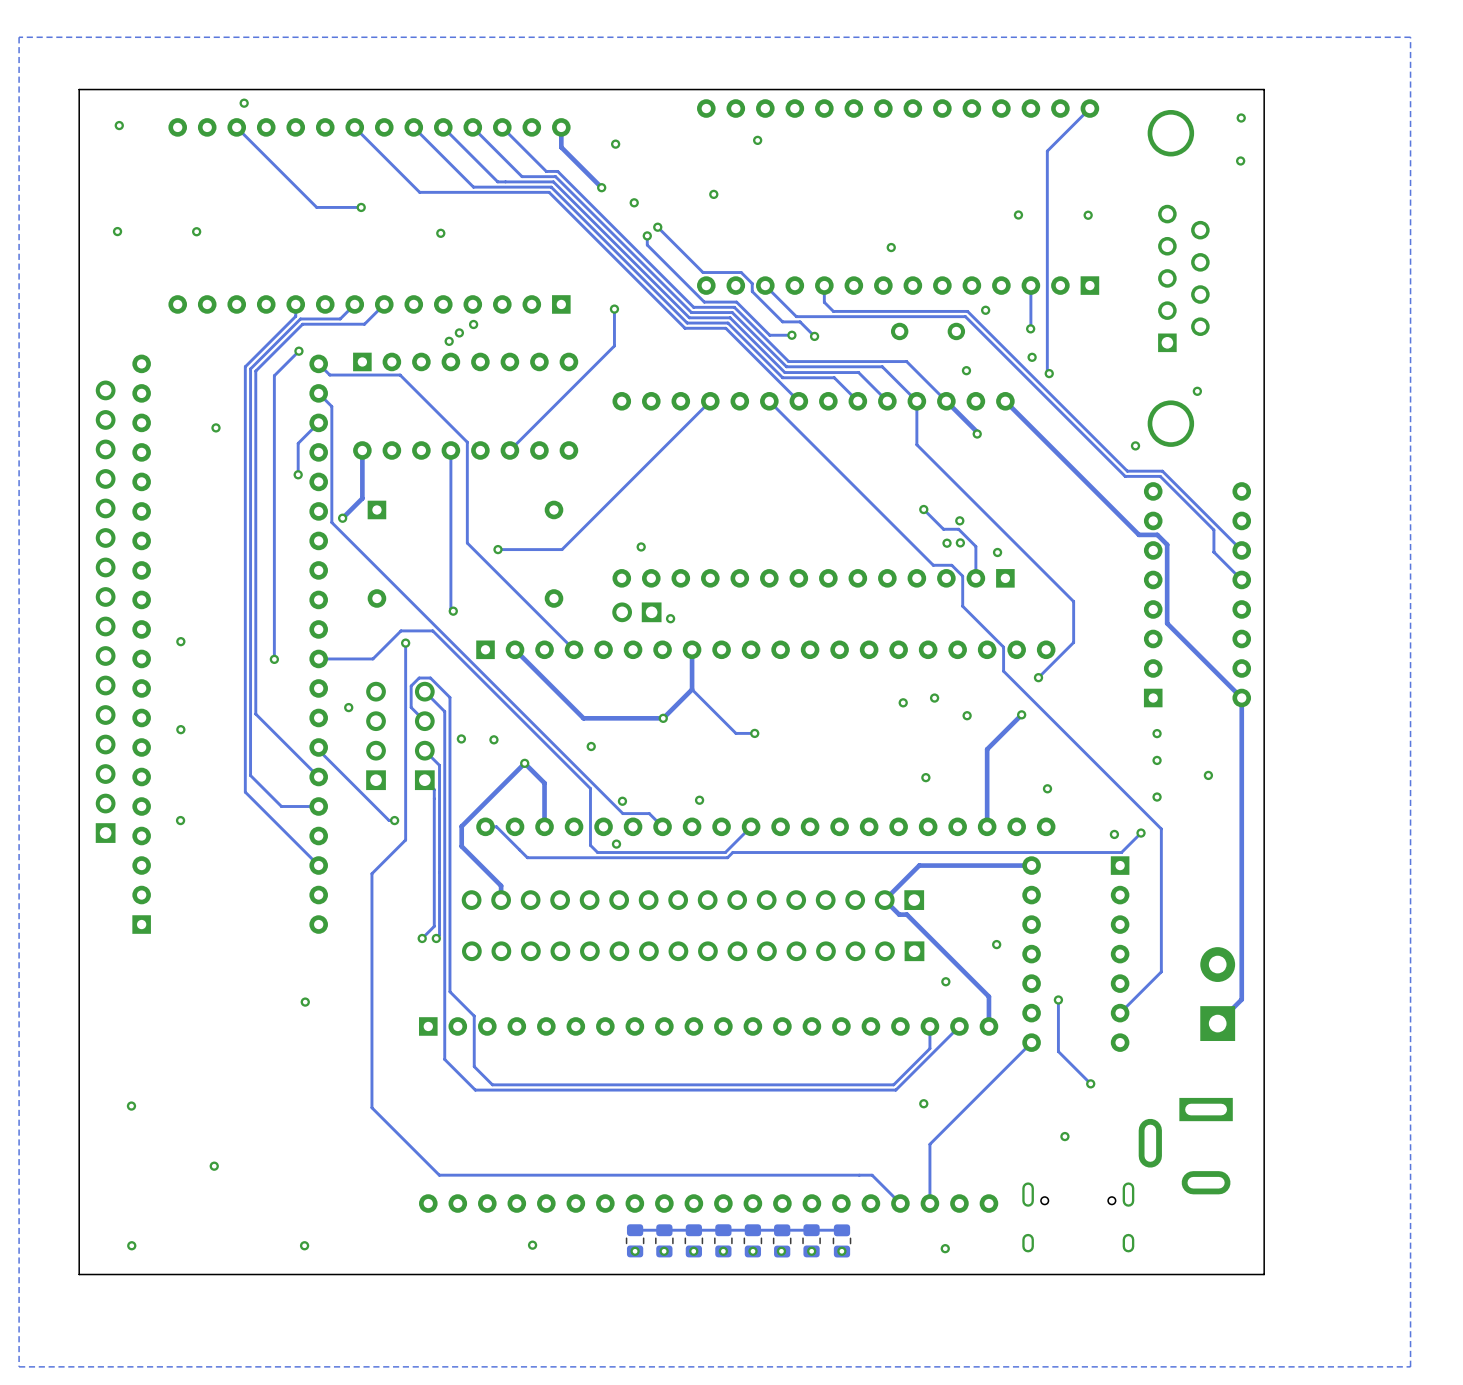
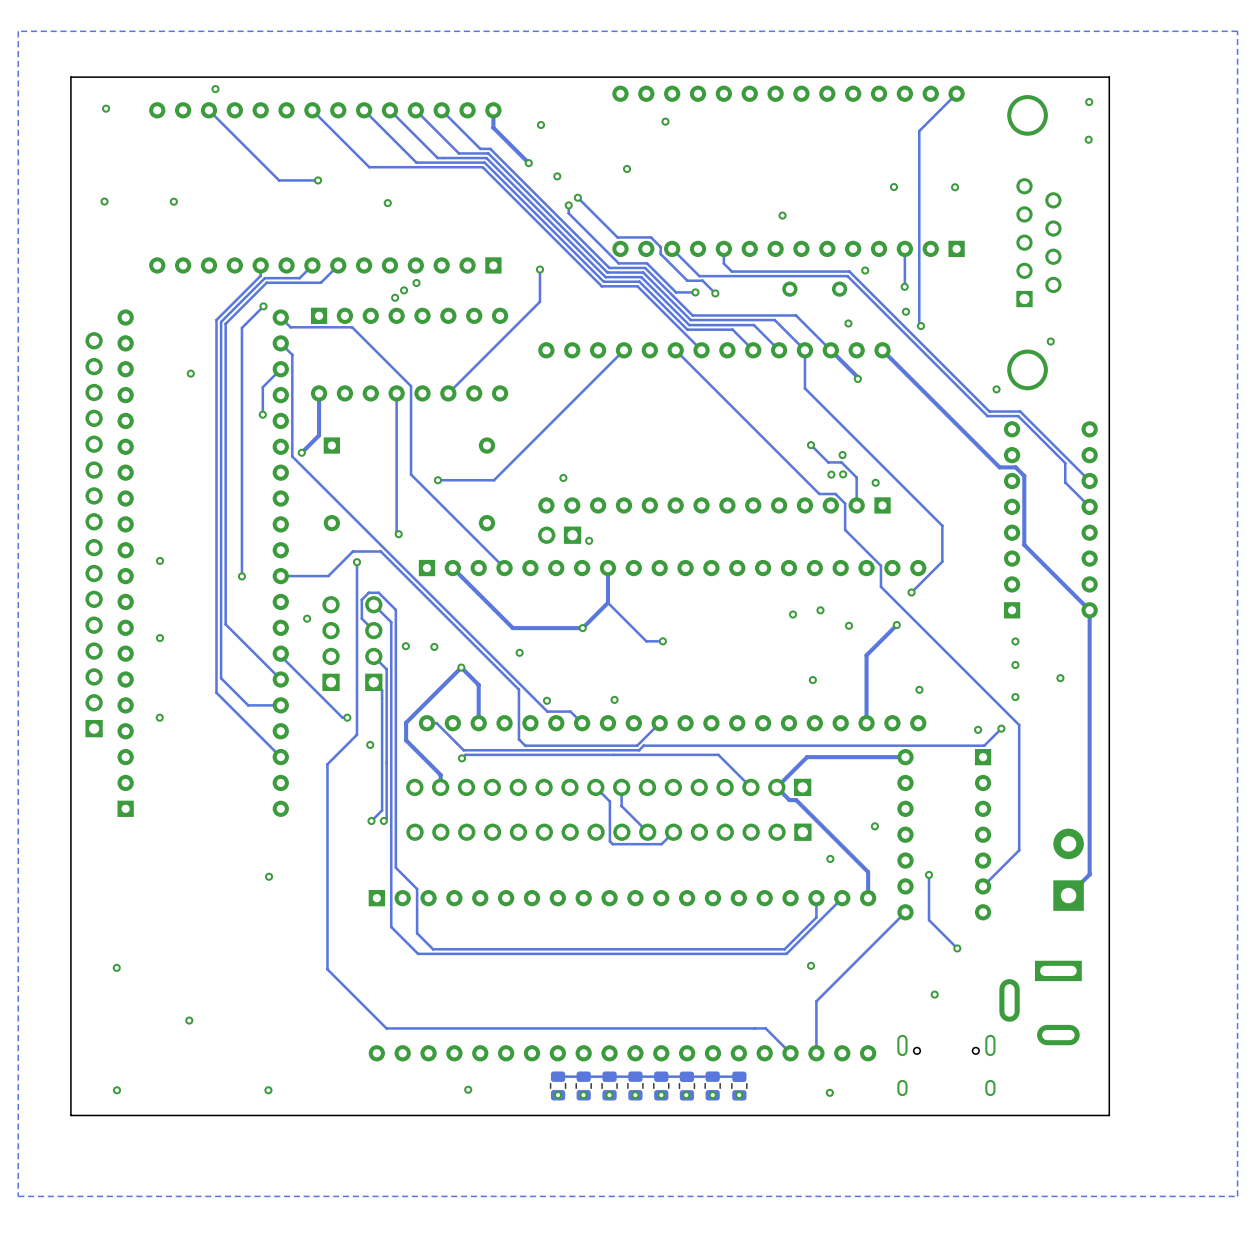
via: (616, 844) -> none
via: none -> (370, 744)
track: none -> (461, 758) (465, 754) (718, 754) (750, 787)
via: none -> (461, 758)
track: none -> (595, 787) (609, 801) (609, 841) (612, 844) (661, 844) (673, 832)
track: none -> (621, 787) (621, 806) (647, 832)

